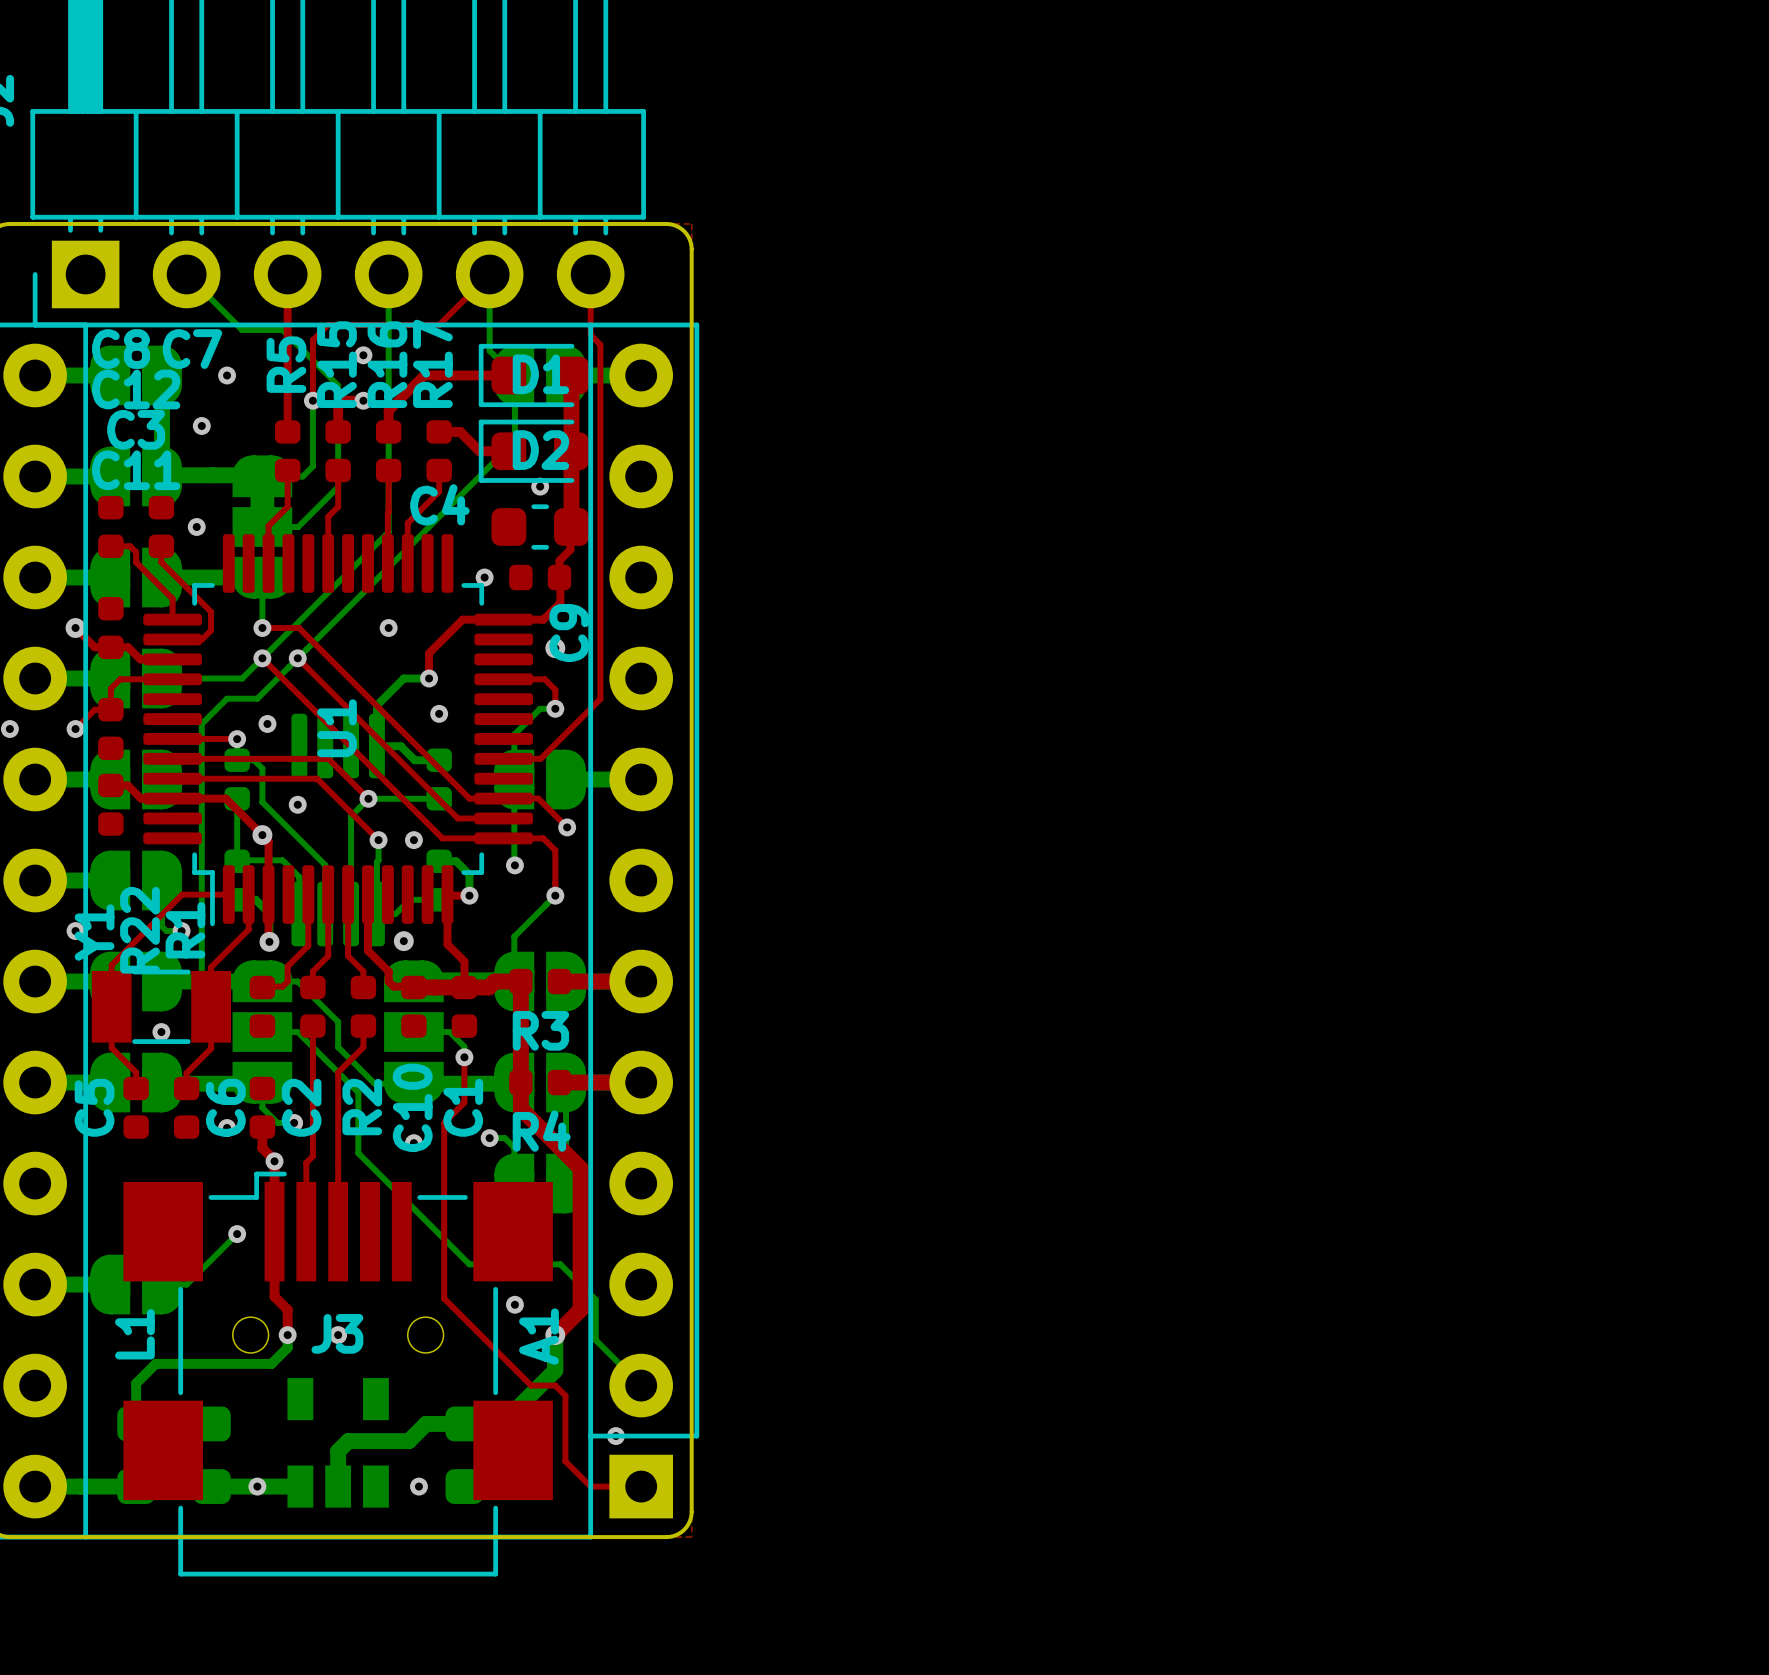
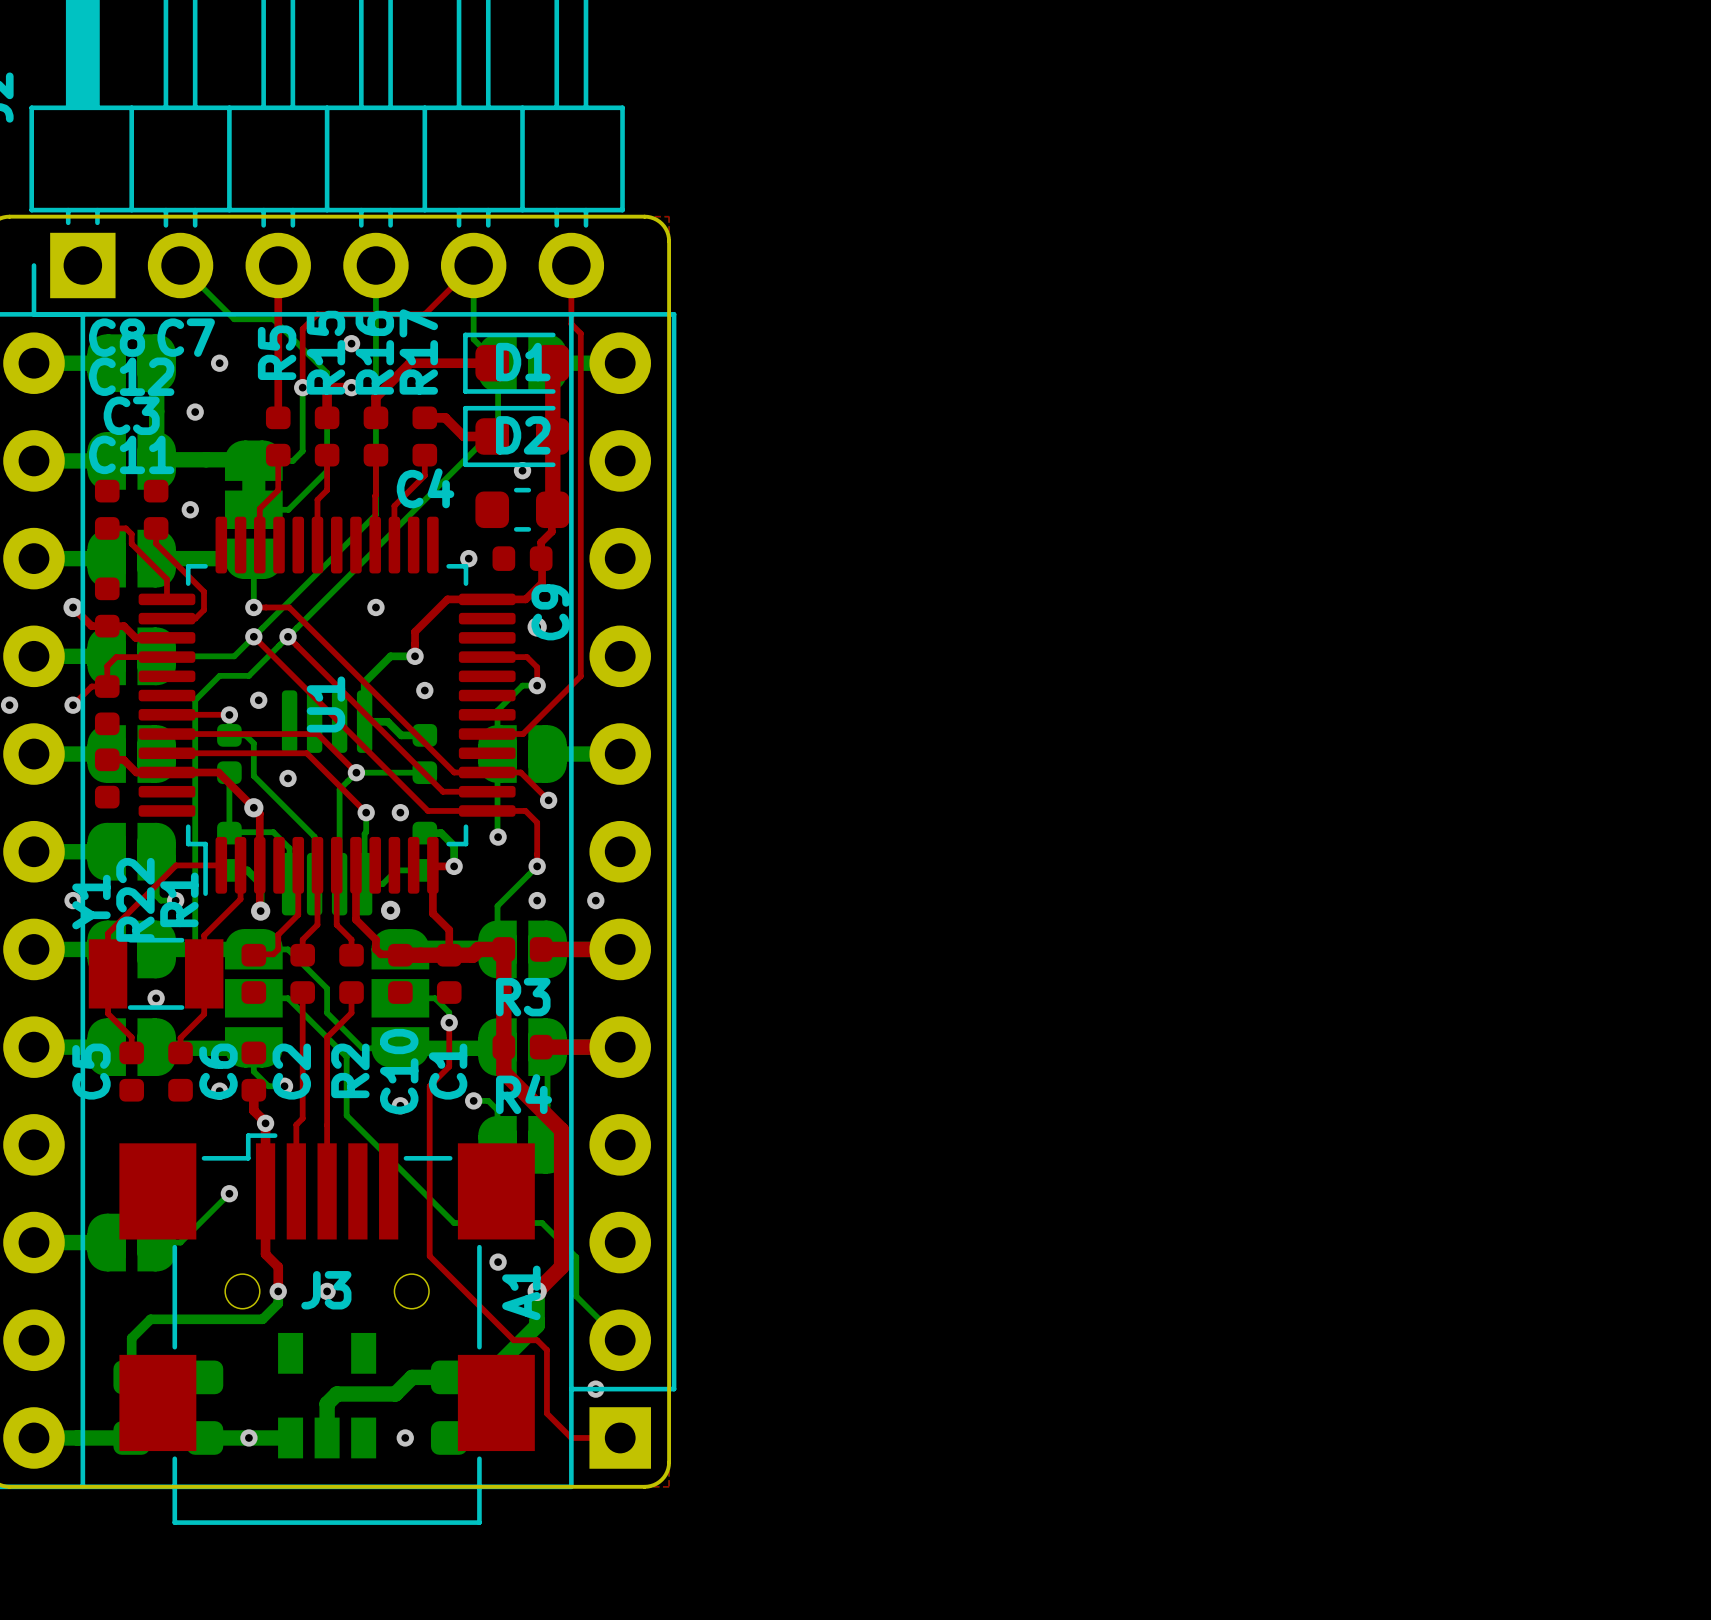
via: none -> (537, 900)
via: none -> (595, 900)
L1 name: L1 (134, 1334) -> none

